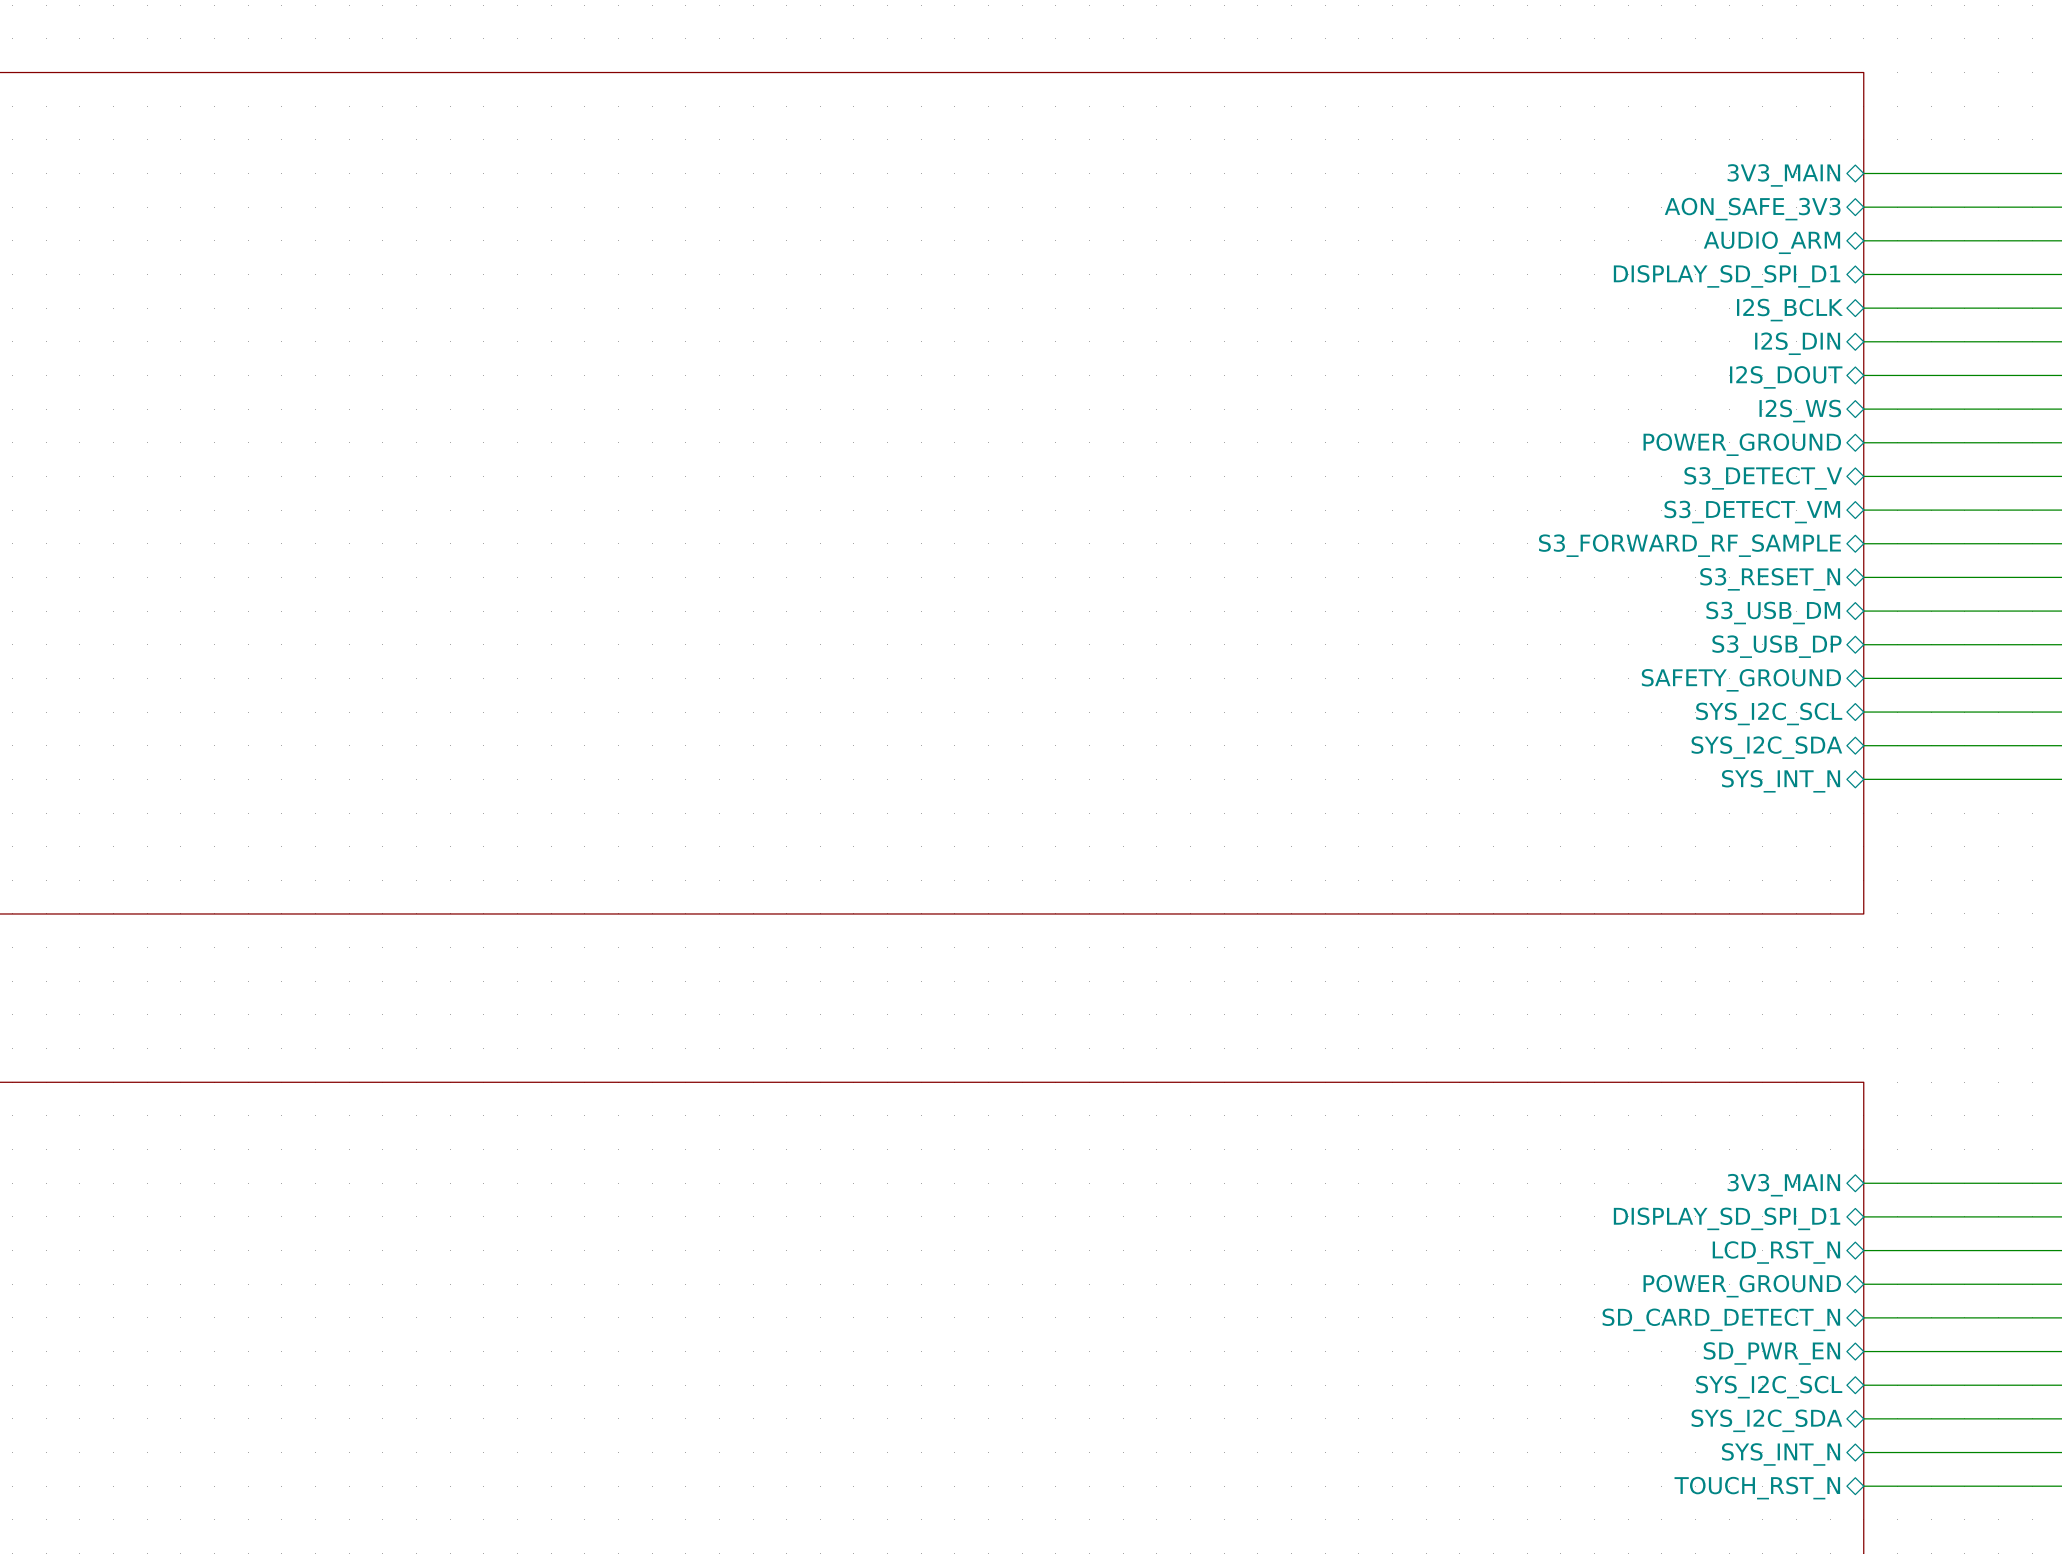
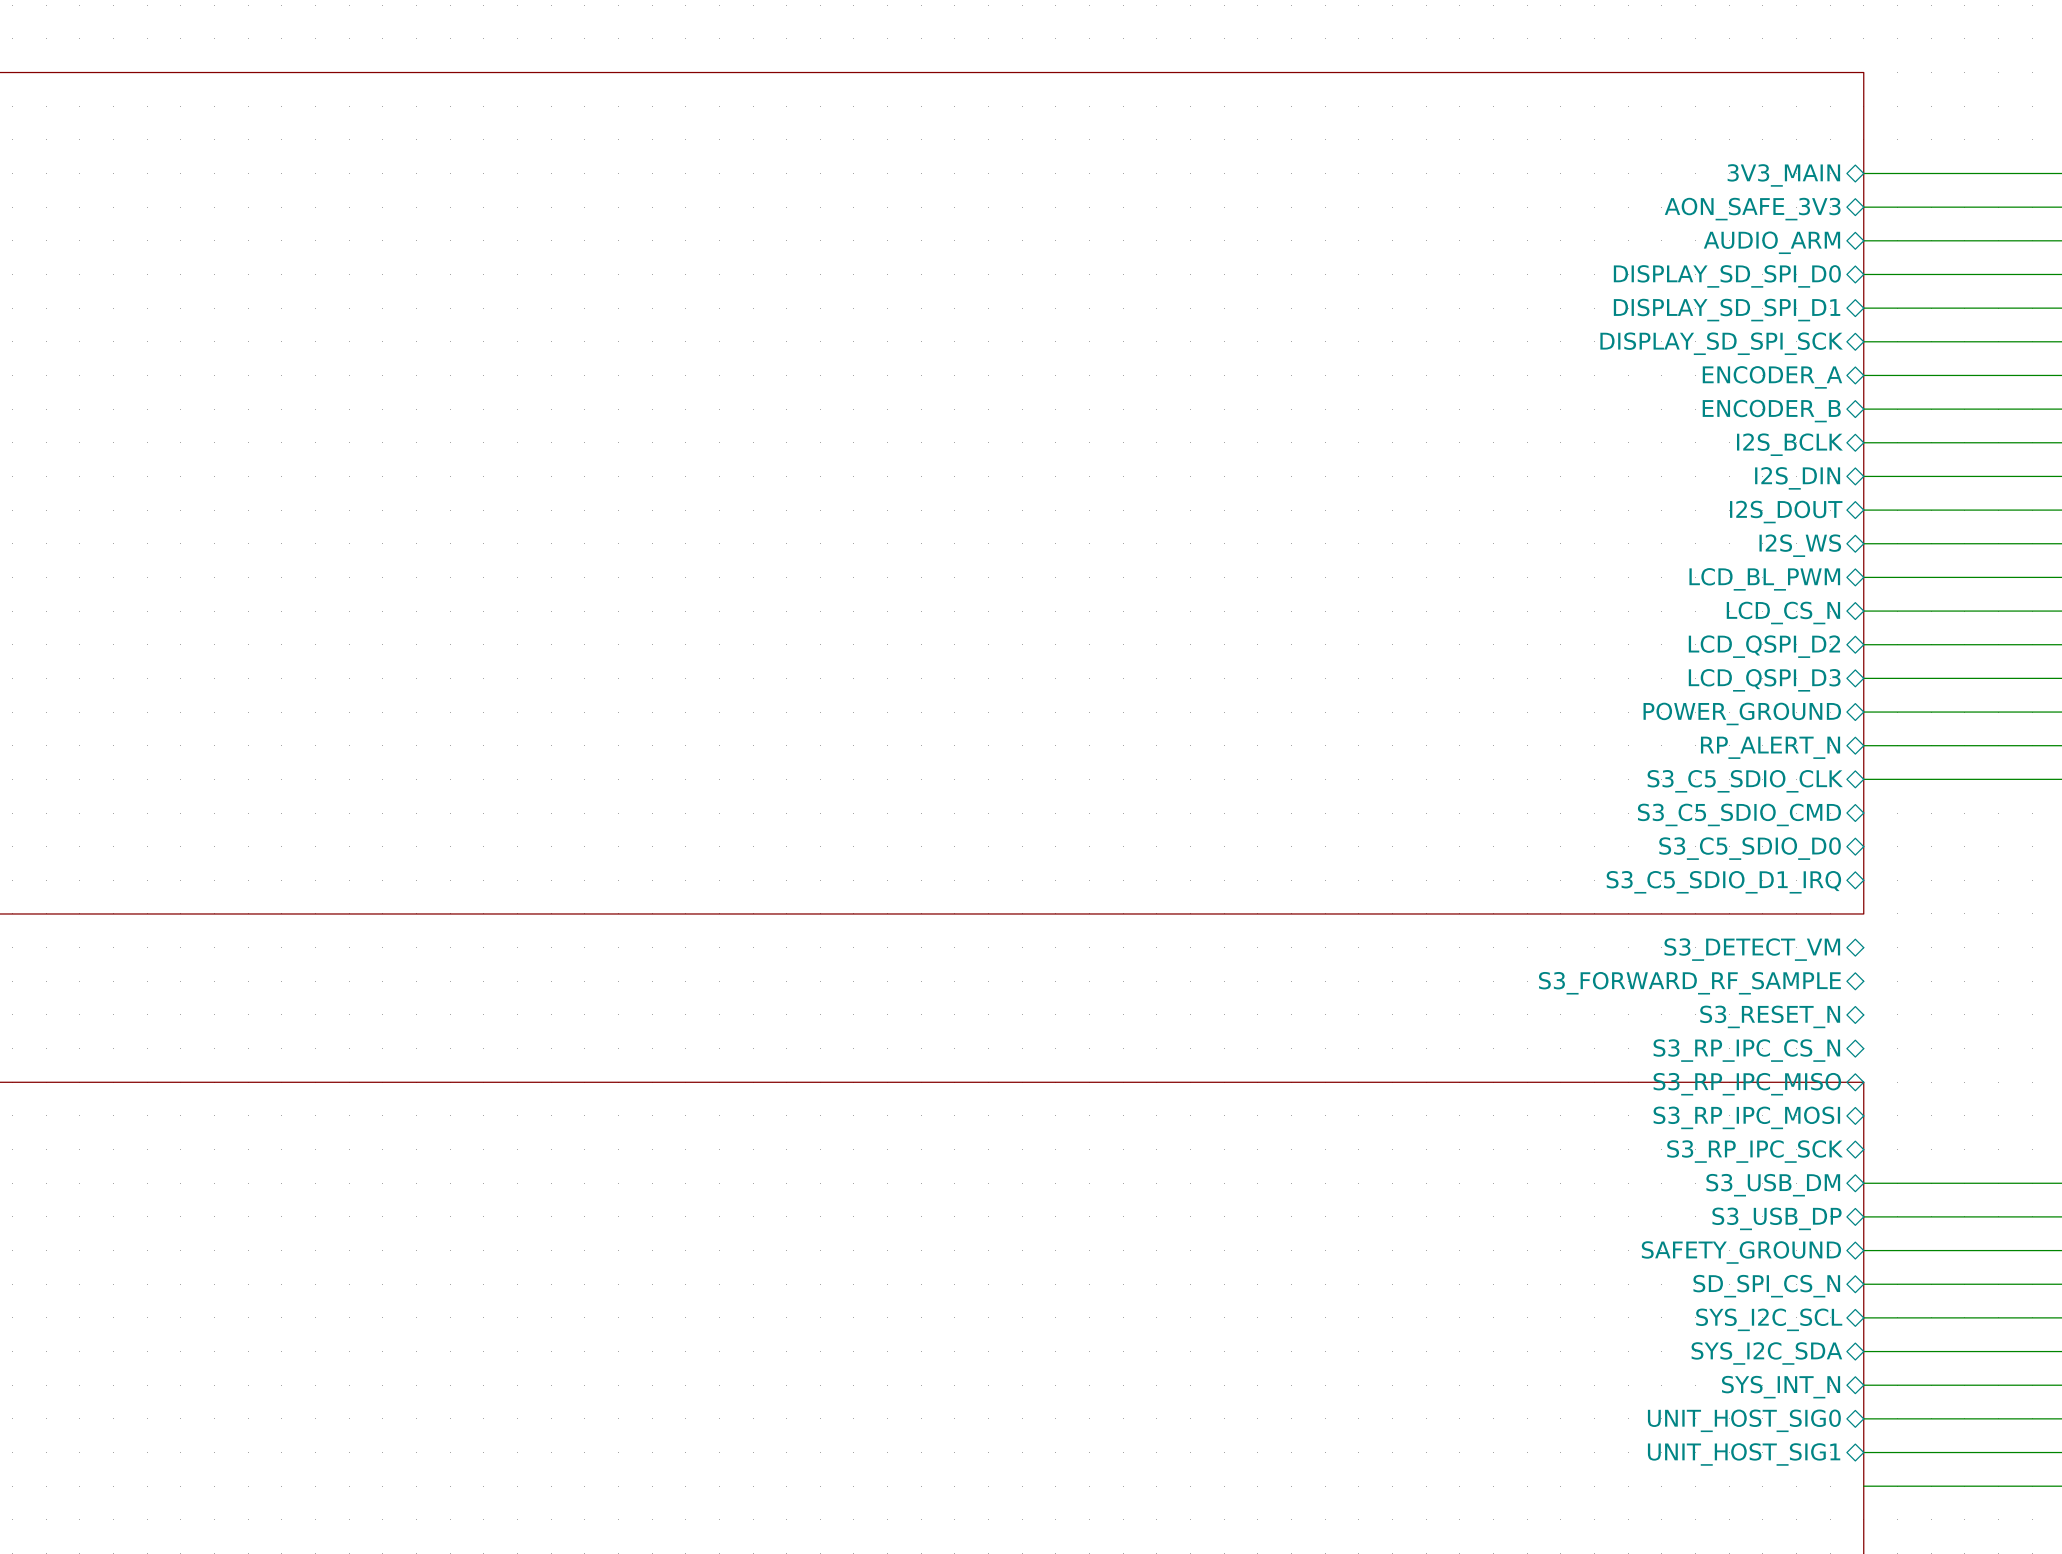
sheet pin: DISPLAY_SD_SPI_D1 (1727, 276) -> DISPLAY_SD_SPI_D0 (1727, 276)
sheet pin: I2S_BCLK (1789, 310) -> DISPLAY_SD_SPI_D1 (1727, 310)
sheet pin: I2S_DIN (1797, 343) -> DISPLAY_SD_SPI_SCK (1721, 343)
sheet pin: I2S_DOUT (1786, 377) -> ENCODER_A (1772, 377)
sheet pin: I2S_WS (1800, 411) -> ENCODER_B (1771, 411)
sheet pin: POWER_GROUND (1742, 444) -> I2S_BCLK (1789, 444)
sheet pin: S3_DETECT_V (1763, 478) -> I2S_DIN (1797, 478)
sheet pin: S3_DETECT_VM (1752, 512) -> I2S_DOUT (1786, 512)
sheet pin: S3_FORWARD_RF_SAMPLE (1689, 545) -> I2S_WS (1800, 545)
sheet pin: S3_RESET_N (1770, 579) -> LCD_BL_PWM (1764, 579)
sheet pin: S3_USB_DM (1773, 613) -> LCD_CS_N (1783, 613)
sheet pin: S3_USB_DP (1776, 646) -> LCD_QSPI_D2 (1764, 646)
sheet pin: SAFETY_GROUND (1741, 680) -> LCD_QSPI_D3 (1764, 680)
sheet pin: SYS_I2C_SCL (1769, 713) -> POWER_GROUND (1742, 713)
sheet pin: SYS_I2C_SDA (1766, 747) -> RP_ALERT_N (1770, 747)
sheet pin: SYS_INT_N (1781, 781) -> S3_C5_SDIO_CLK (1745, 781)
sheet pin: none -> S3_C5_SDIO_CMD (1739, 814)
sheet pin: none -> S3_C5_SDIO_D0 (1750, 848)
sheet pin: none -> S3_C5_SDIO_D1_IRQ (1723, 882)
sheet pin: none -> S3_DETECT_VM (1752, 949)
sheet pin: none -> S3_FORWARD_RF_SAMPLE (1689, 983)
sheet pin: none -> S3_RESET_N (1770, 1016)
sheet pin: none -> S3_RP_IPC_CS_N (1746, 1050)
sheet pin: none -> S3_RP_IPC_MISO (1747, 1084)
sheet pin: none -> S3_RP_IPC_MOSI (1746, 1117)
sheet pin: none -> S3_RP_IPC_SCK (1755, 1151)
sheet pin: 3V3_MAIN (1783, 1185) -> S3_USB_DM (1773, 1185)
sheet pin: DISPLAY_SD_SPI_D1 (1727, 1218) -> S3_USB_DP (1776, 1218)
sheet pin: LCD_RST_N (1776, 1252) -> SAFETY_GROUND (1741, 1252)
sheet pin: POWER_GROUND (1742, 1286) -> SD_SPI_CS_N (1766, 1286)
sheet pin: SD_CARD_DETECT_N (1721, 1319) -> SYS_I2C_SCL (1769, 1319)
sheet pin: SD_PWR_EN (1771, 1353) -> SYS_I2C_SDA (1766, 1353)
sheet pin: SYS_I2C_SCL (1769, 1387) -> SYS_INT_N (1781, 1387)
sheet pin: SYS_I2C_SDA (1766, 1420) -> UNIT_HOST_SIG0 (1744, 1420)
sheet pin: SYS_INT_N (1781, 1454) -> UNIT_HOST_SIG1 (1744, 1454)
sheet pin: TOUCH_RST_N (1757, 1488) -> none

